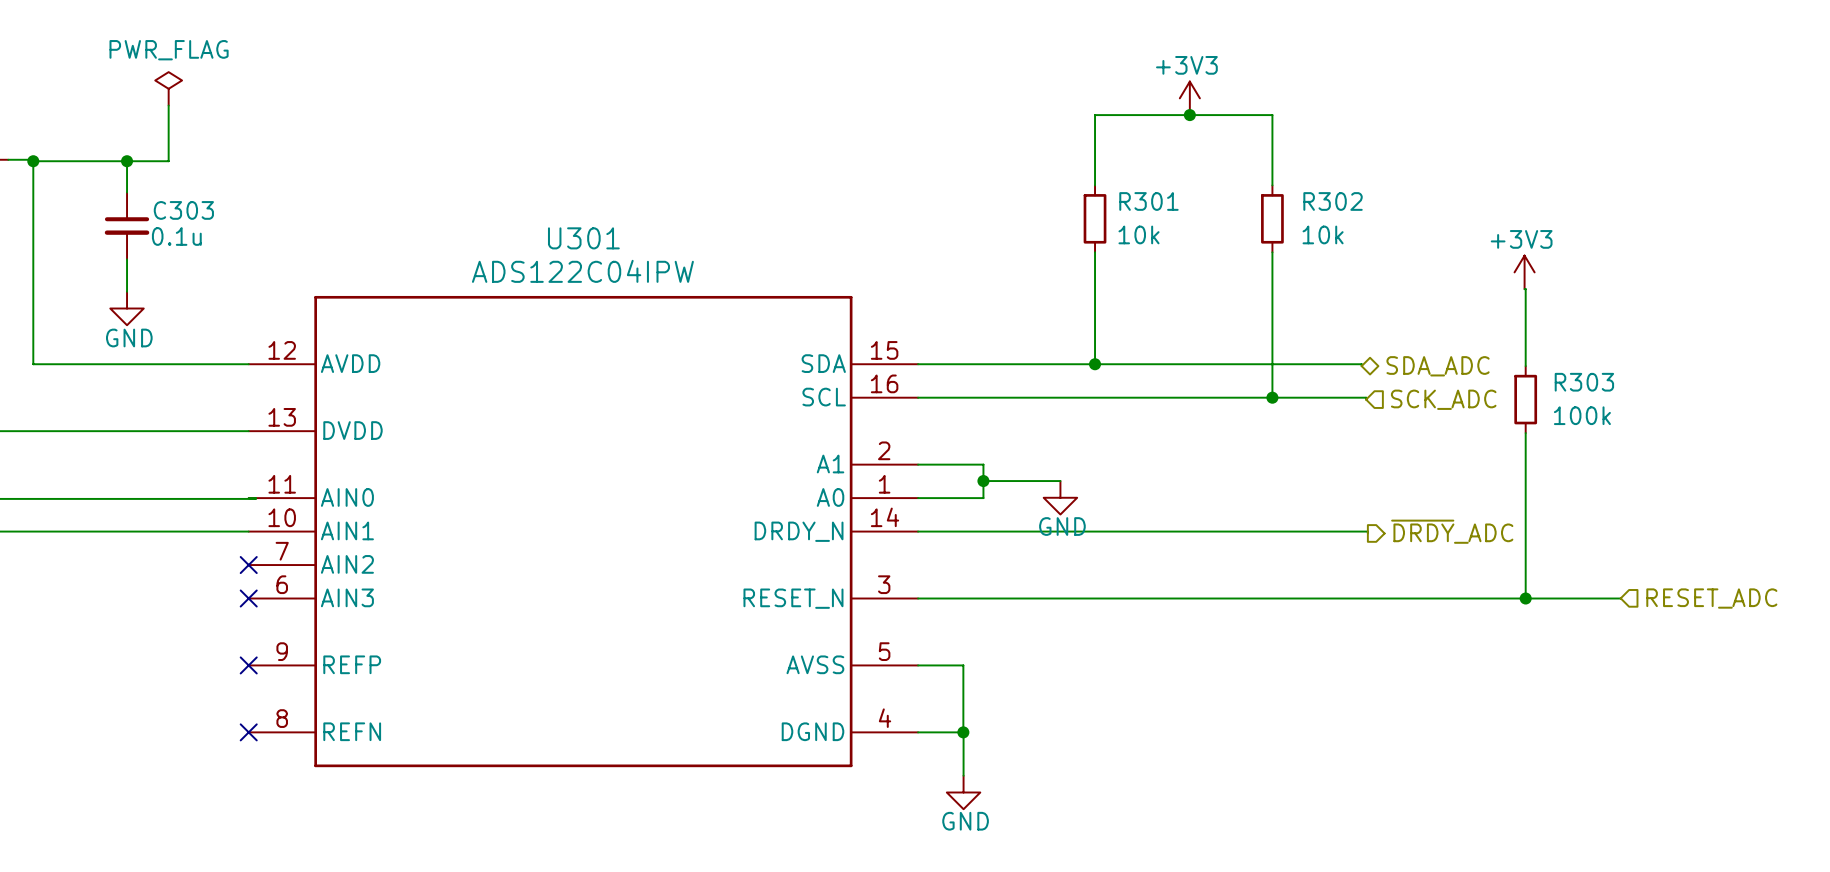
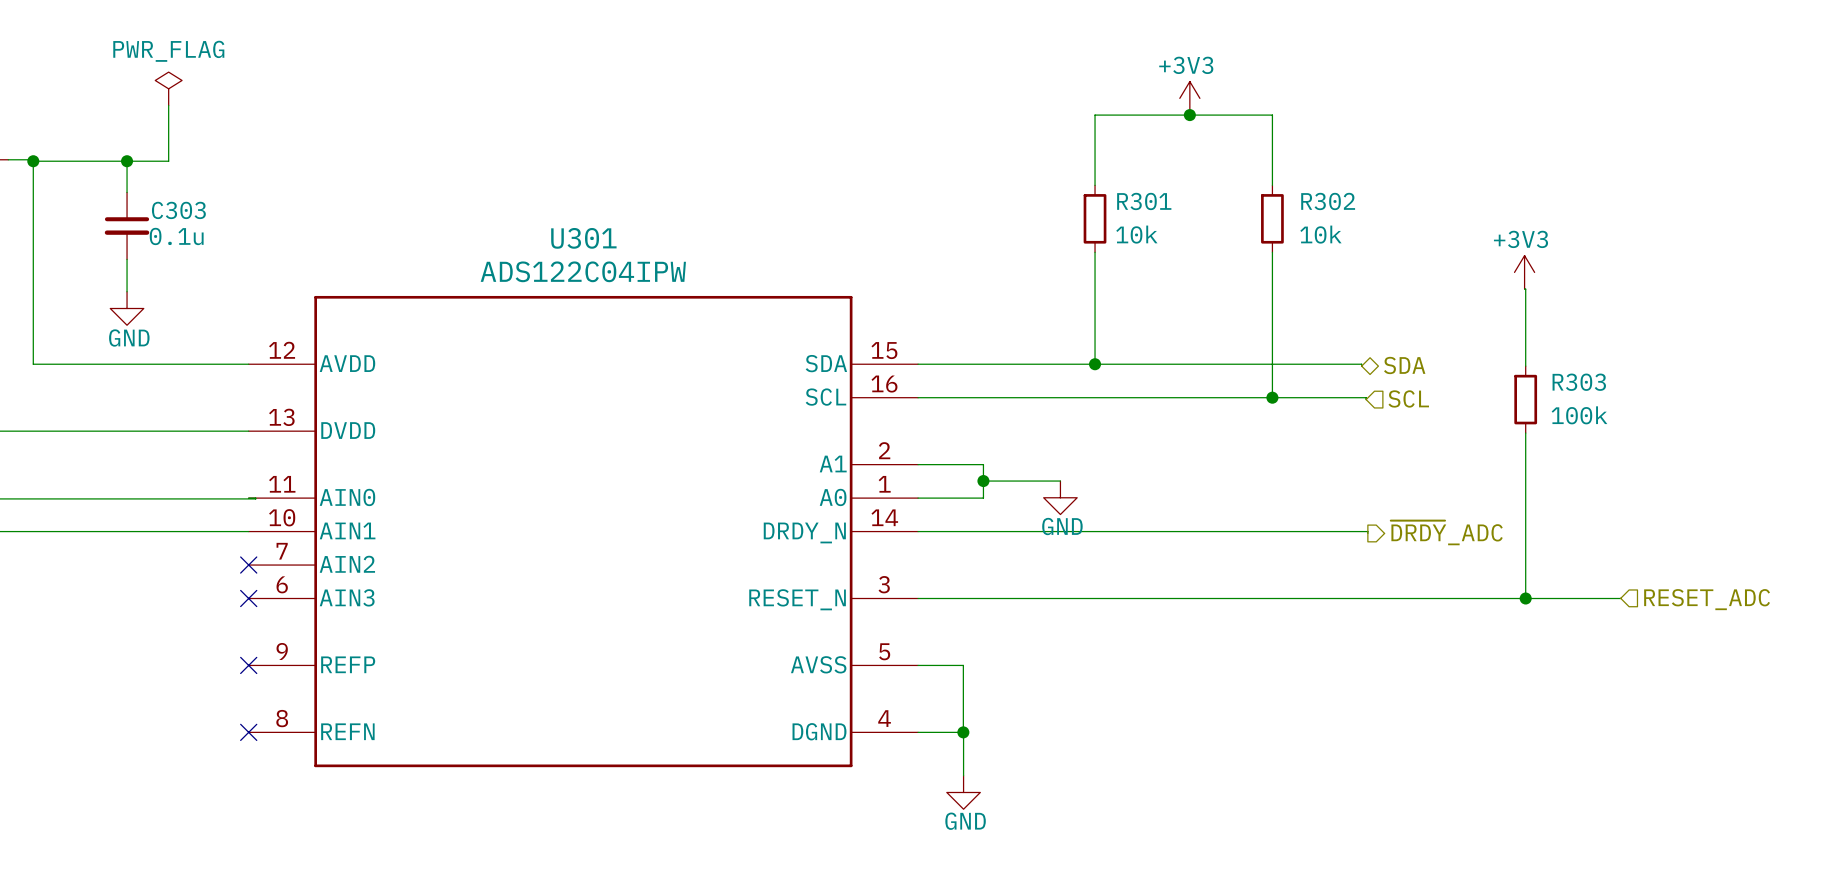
hierarchical label: SDA_ADC (1438, 366) -> SDA (1404, 365)
hierarchical label: SCK_ADC (1443, 399) -> SCL (1408, 398)

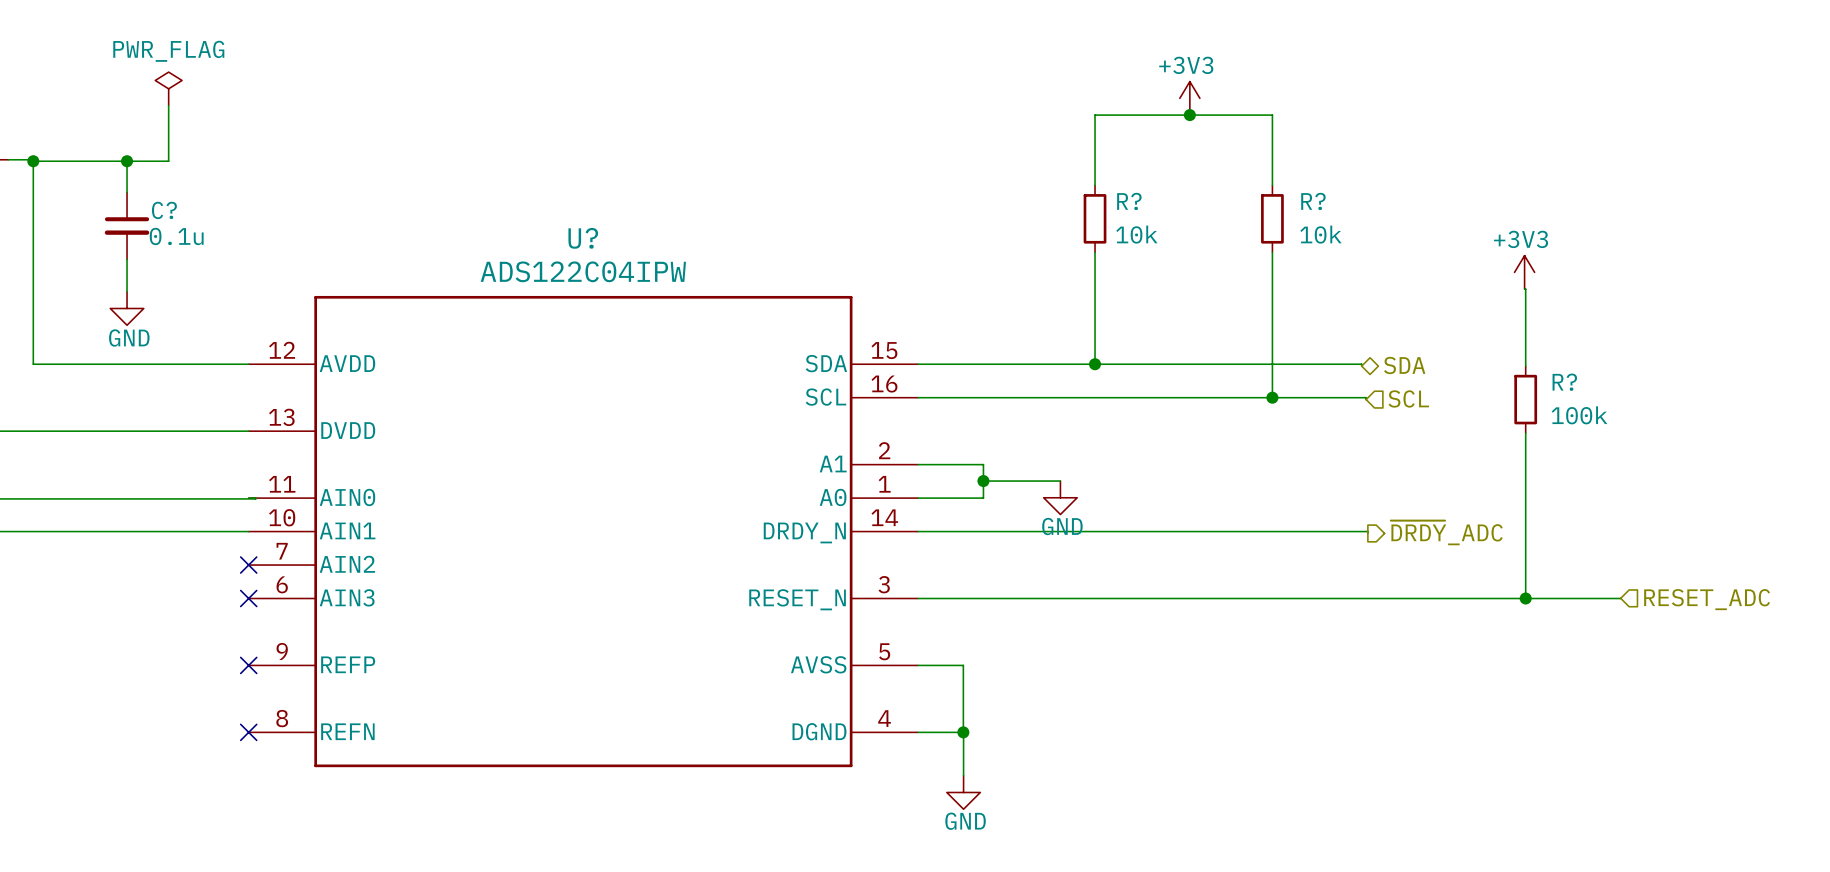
R301 name: R301 (1144, 201) -> R? (1129, 201)
R302 name: R302 (1328, 201) -> R? (1313, 201)
C303 name: C303 (178, 210) -> C? (164, 210)
U301 name: U301 (583, 238) -> U? (583, 238)
R303 name: R303 (1579, 382) -> R? (1564, 382)

